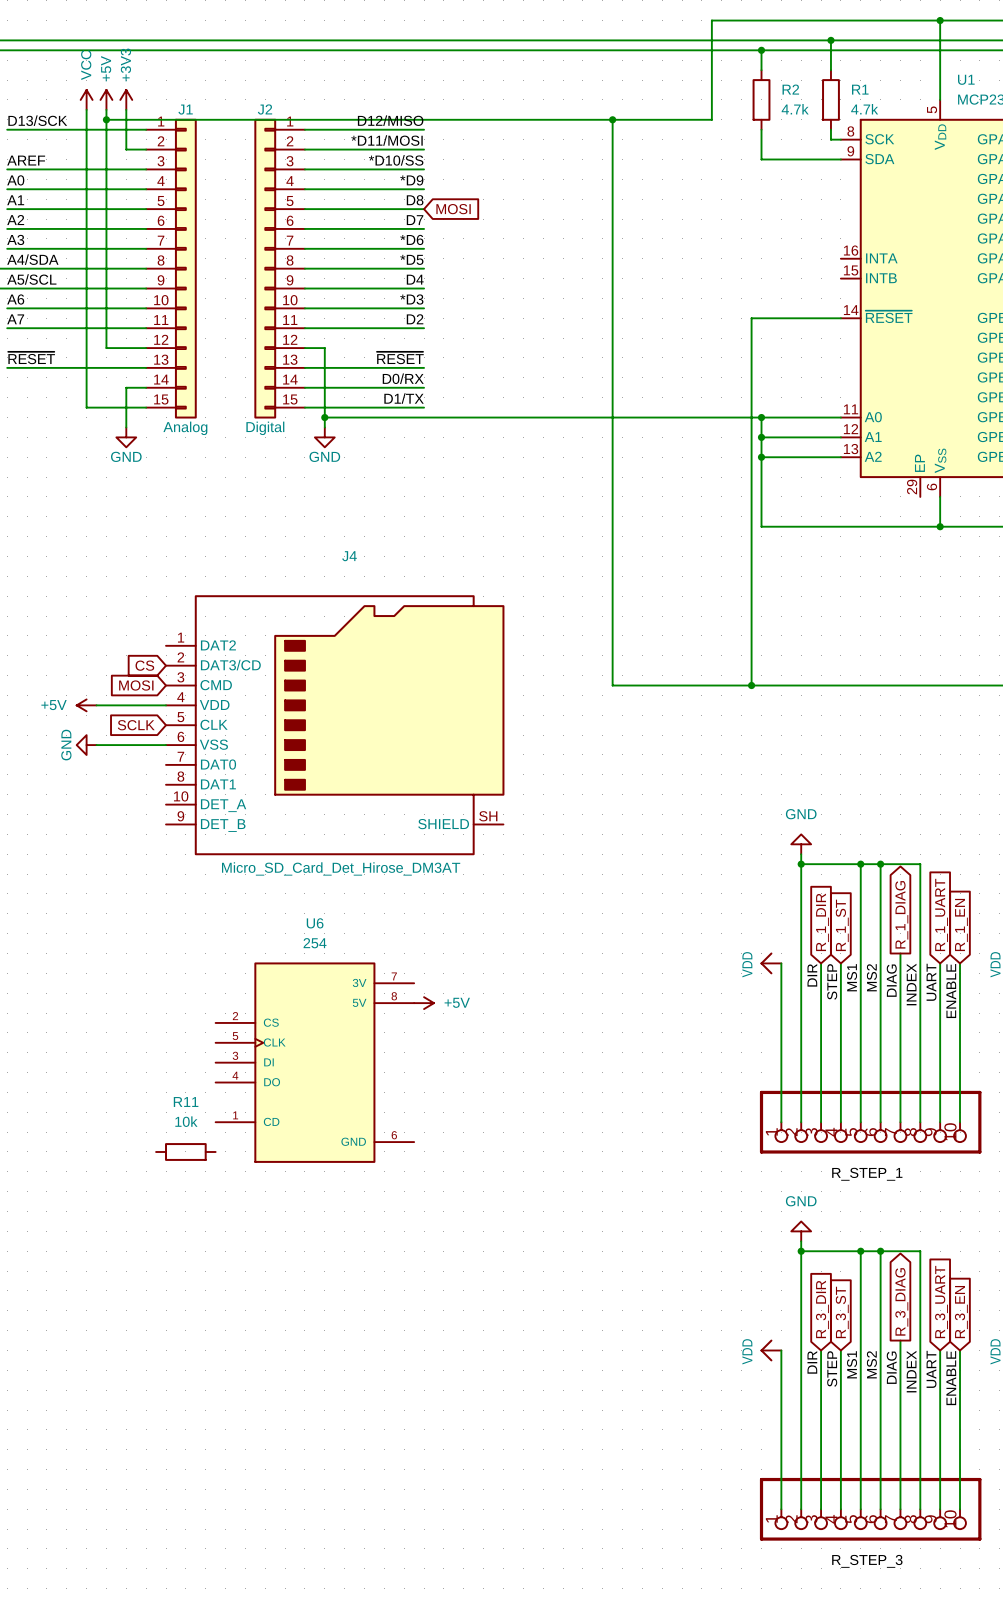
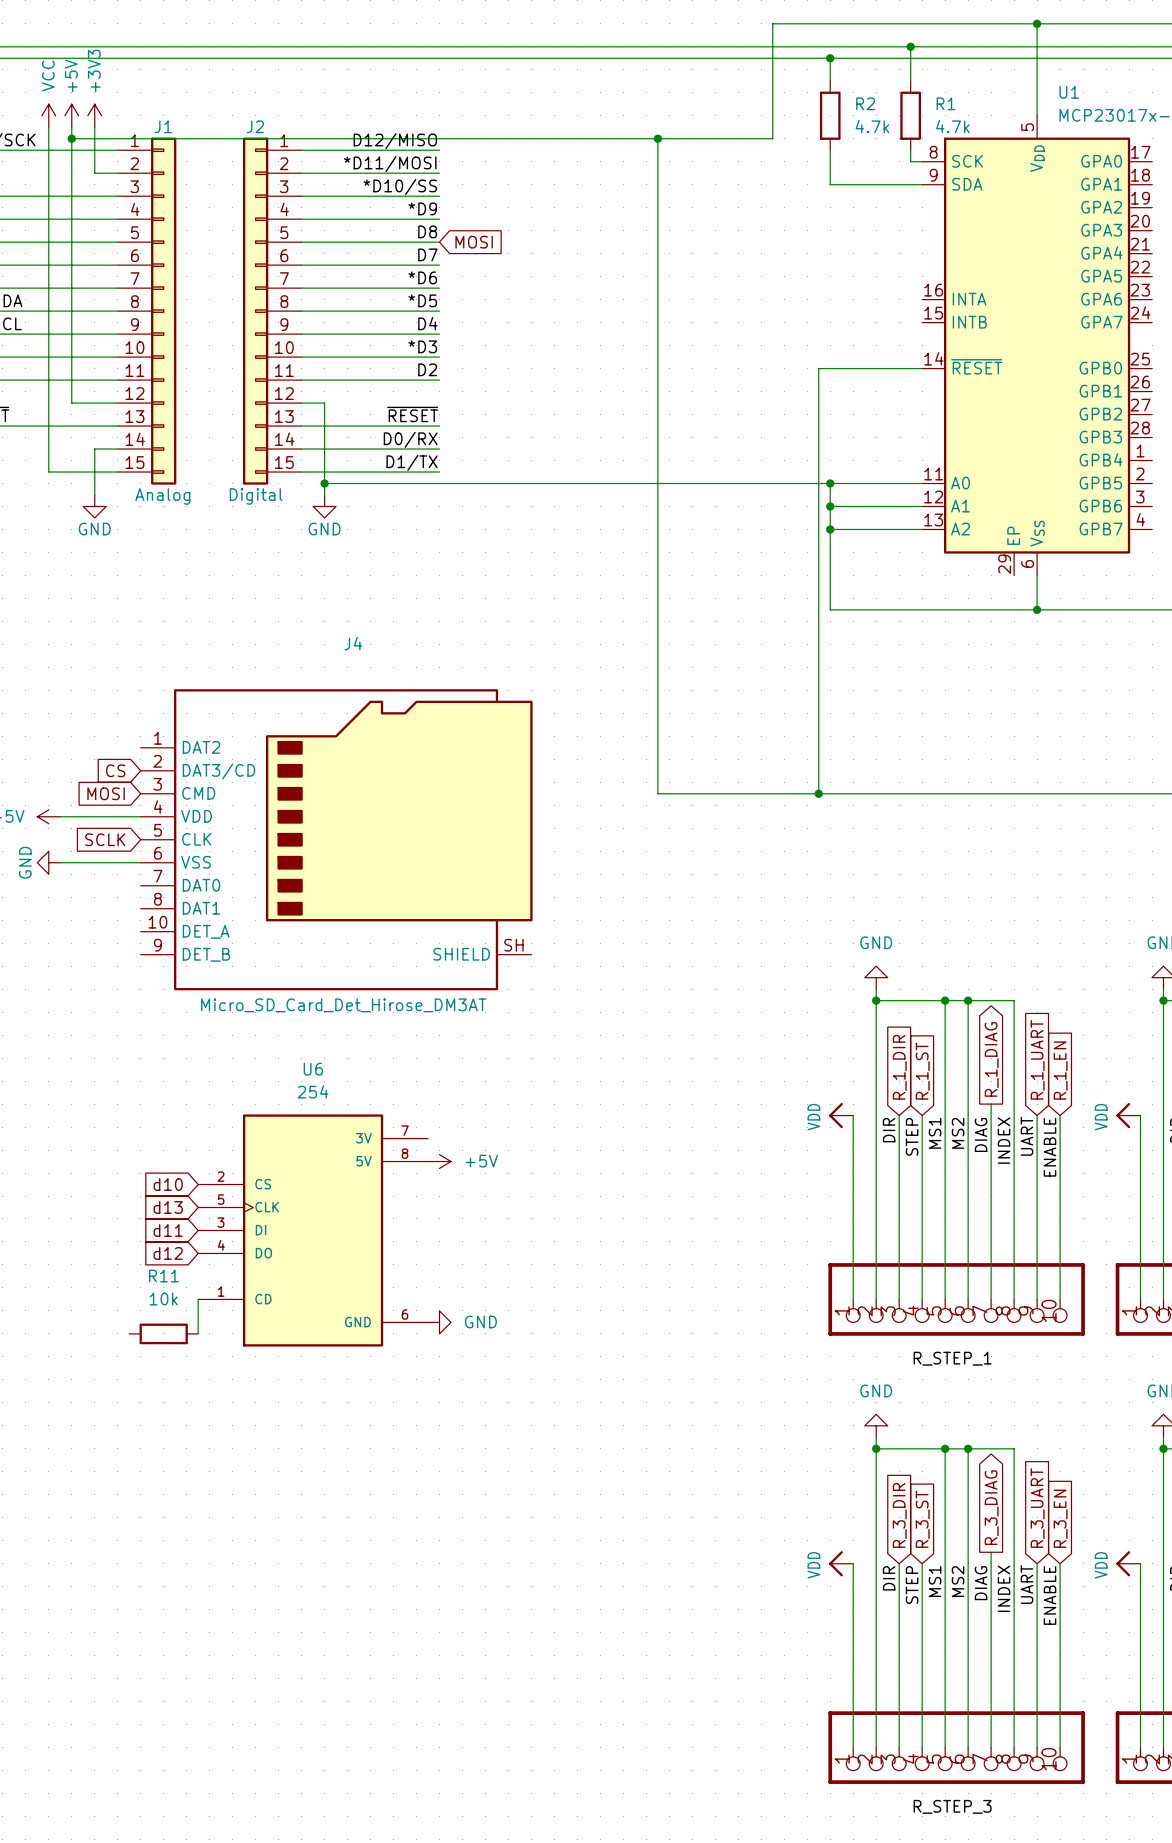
global label: none -> d10 (168, 1184)
global label: none -> d13 (168, 1207)
global label: none -> d11 (168, 1230)
global label: none -> d12 (168, 1253)
wire: none -> (198, 1299) (198, 1333)
power symbol: none -> GND (439, 1322)

